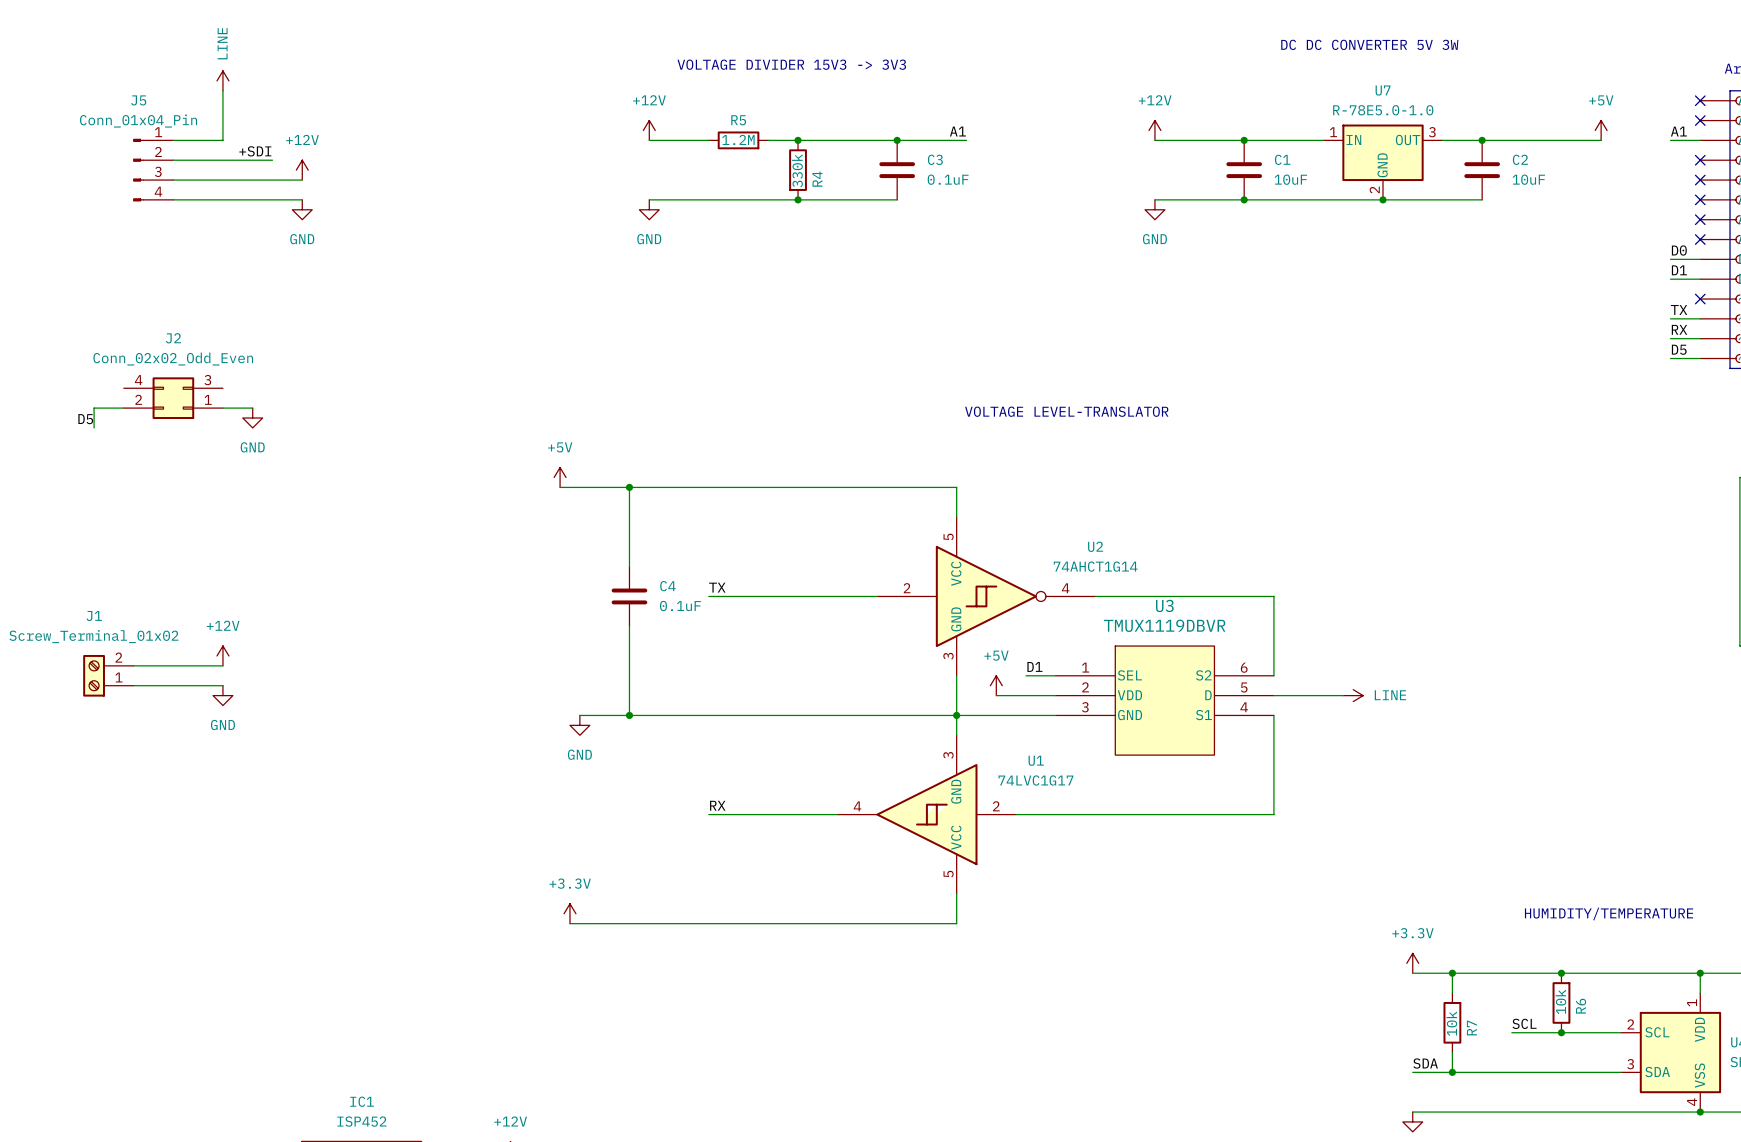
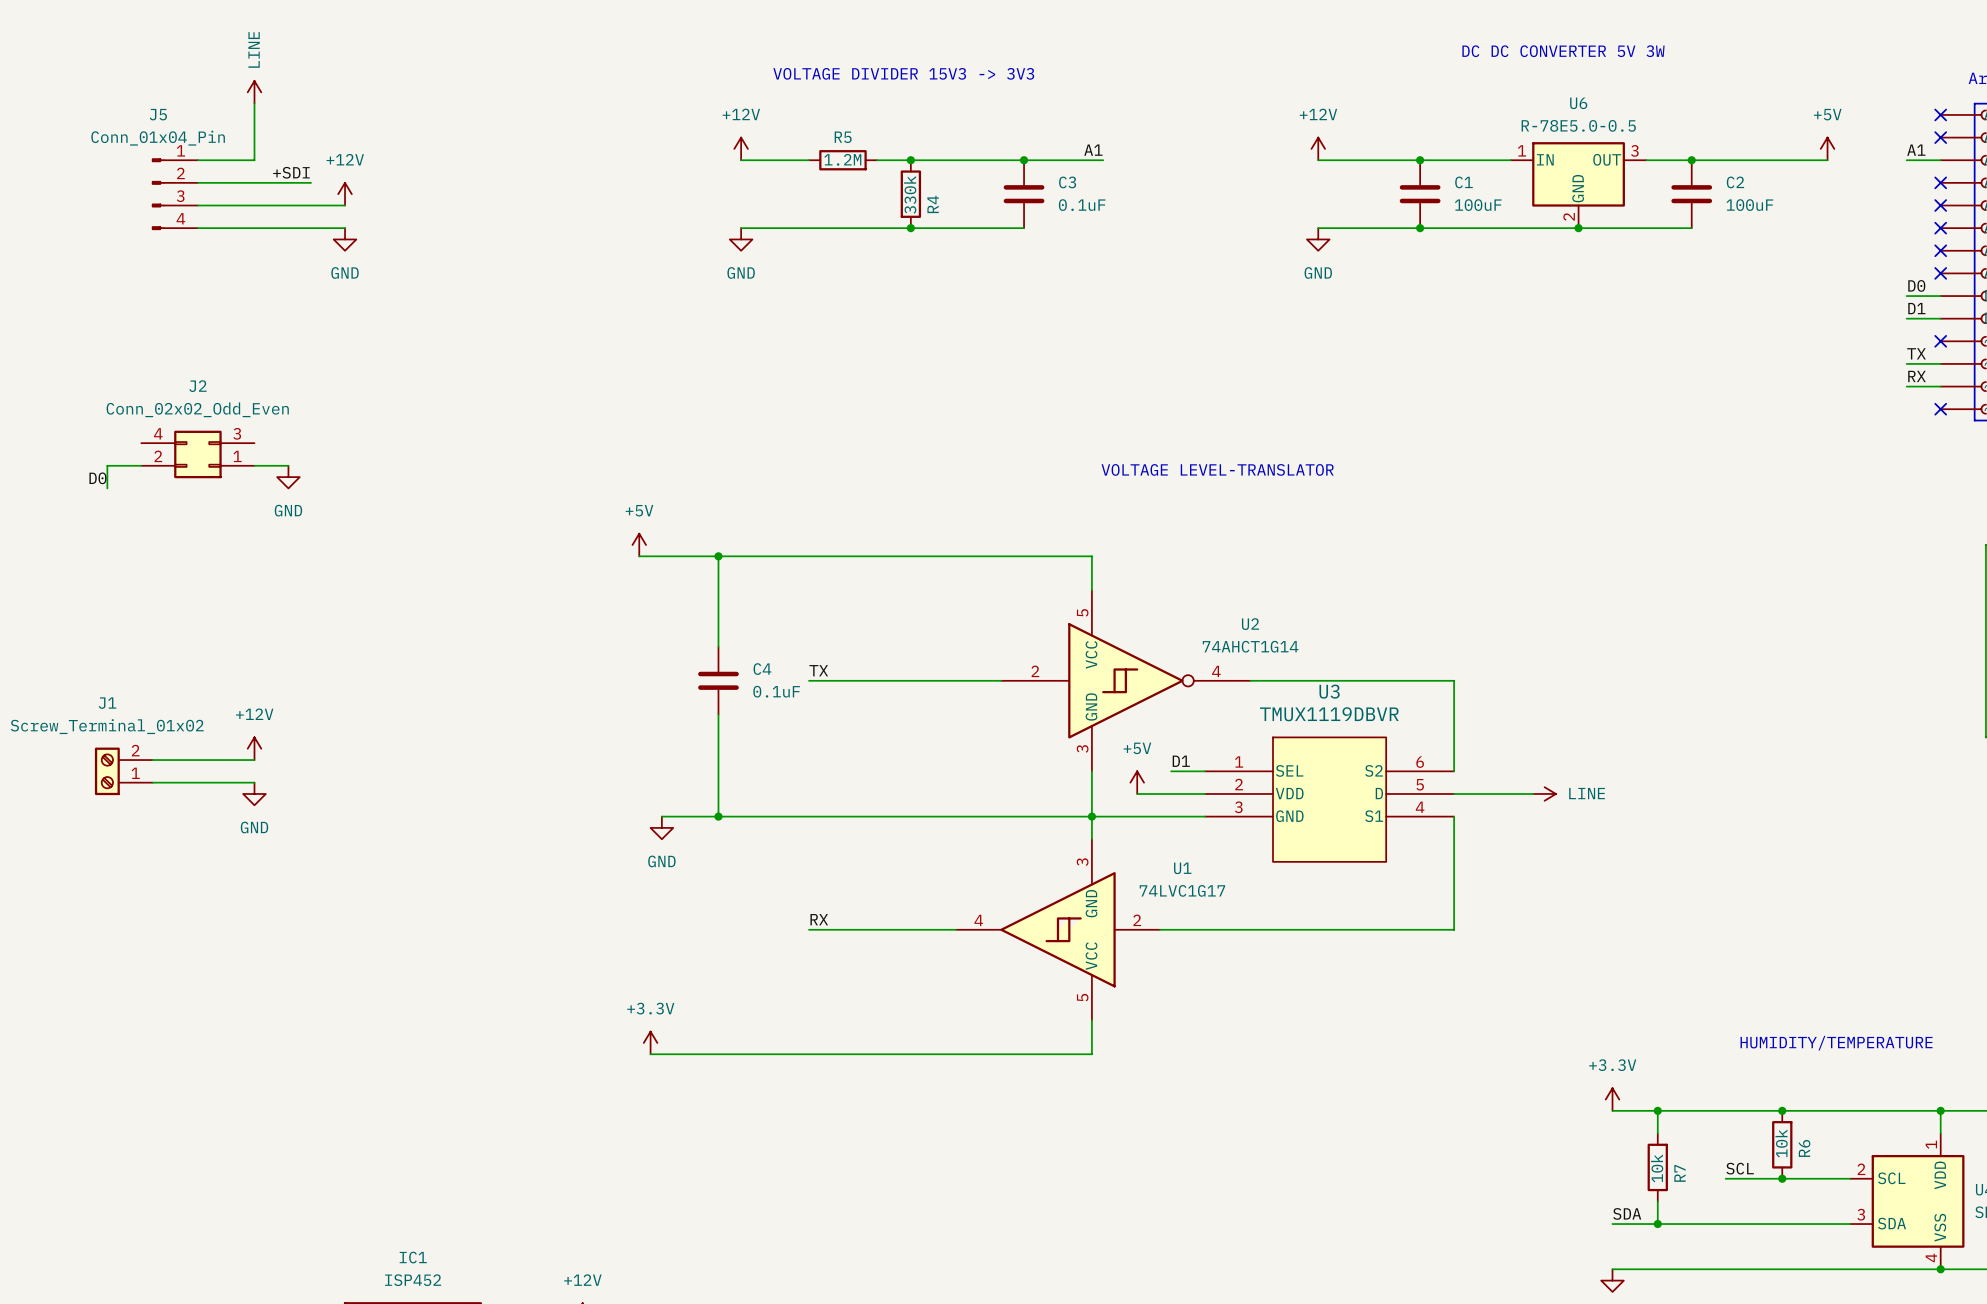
U7 name: U7 (1383, 90) -> U6 (1578, 103)
U7 value: R-78E5.0-1.0 (1383, 110) -> R-78E5.0-0.5 (1578, 125)
C1 value: 10uF (1290, 179) -> 100uF (1478, 205)
C2 value: 10uF (1528, 179) -> 100uF (1749, 205)
label: D5 (1679, 349) -> none
wire: (1670, 358) (1700, 358) -> none
no-connect mark: none -> (1940, 409)
label: D5 (85, 419) -> D0 (97, 478)

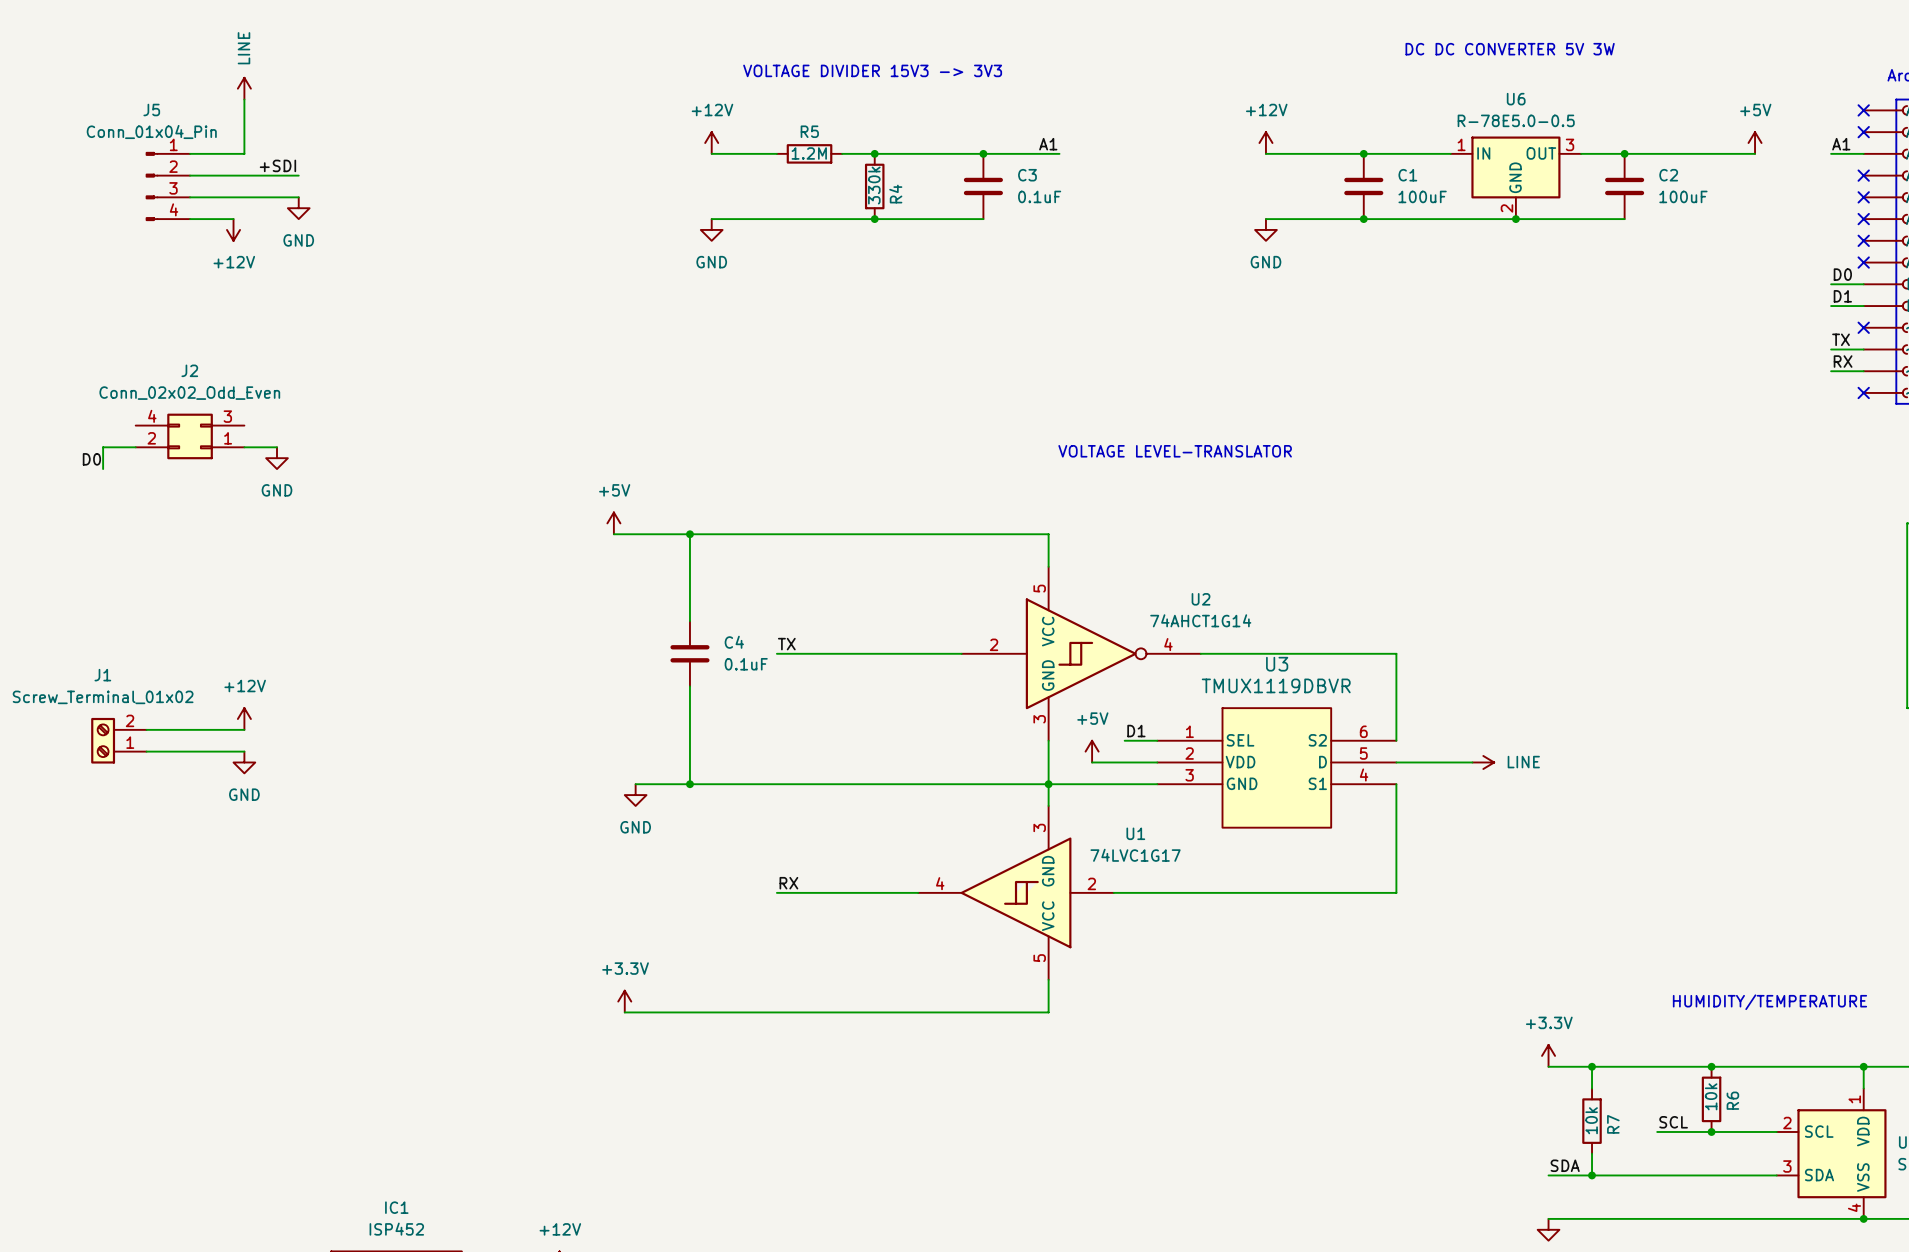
power symbol rotation: 0° (345, 194) -> 180° (233, 229)
power symbol position: +12V (345, 194) -> +12V (233, 229)
wire: (311, 205) (345, 205) -> none
wire: (243, 228) (345, 228) -> none
power symbol position: GND (345, 239) -> GND (298, 208)

